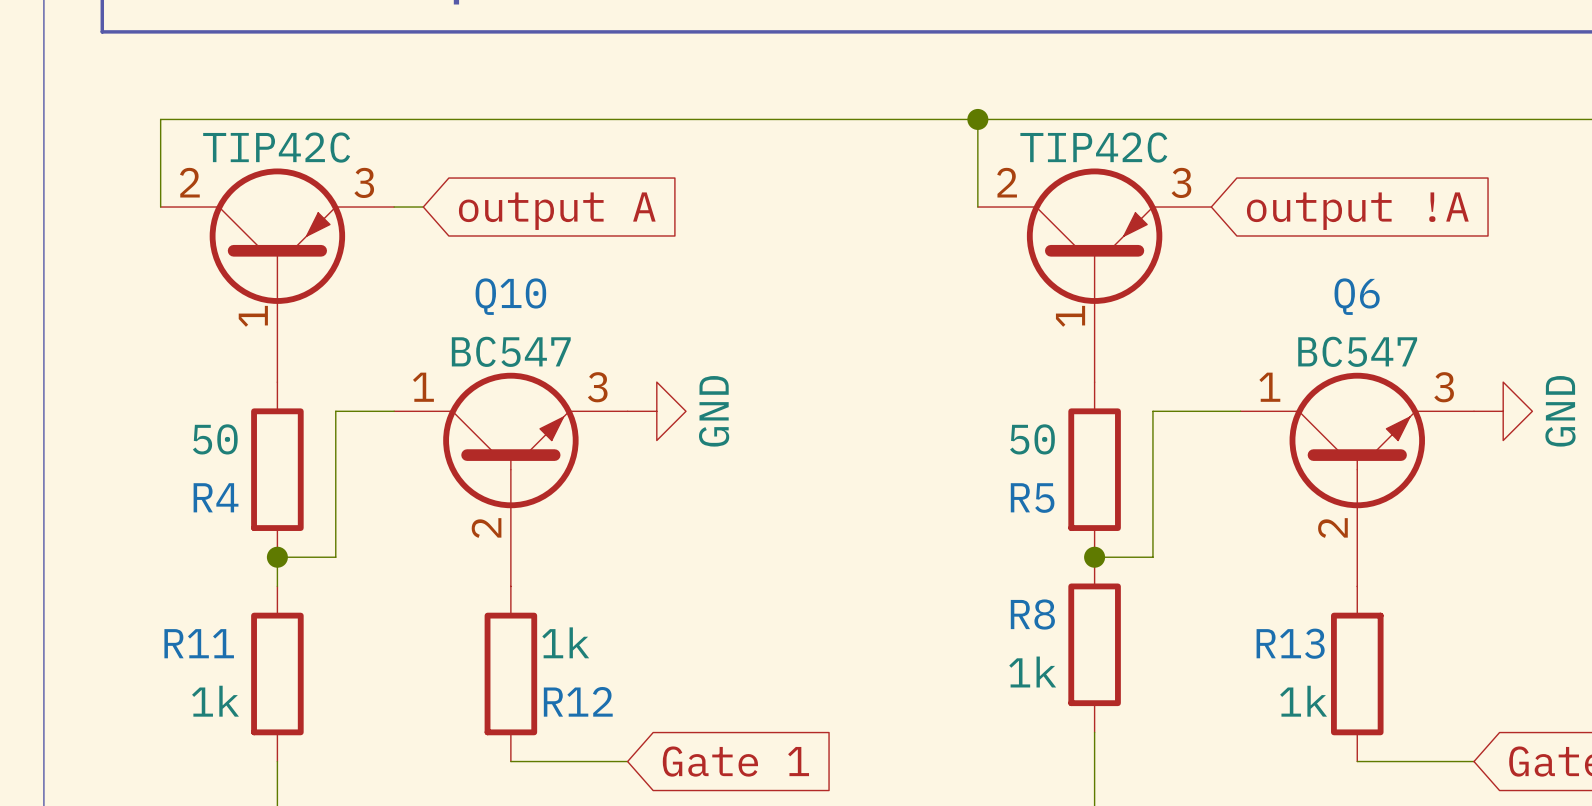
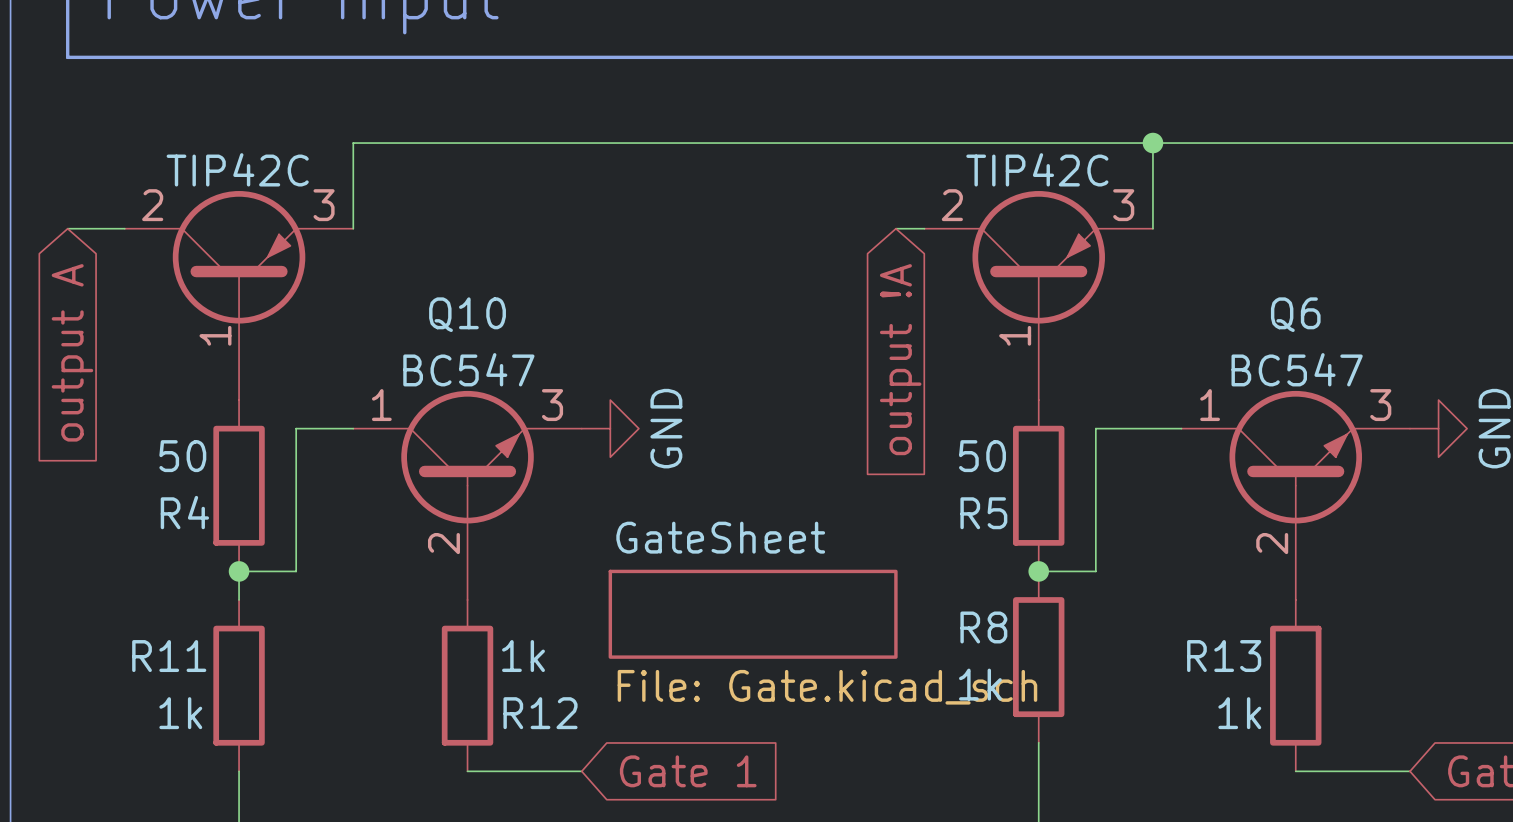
wire: (394, 119) (160, 119) (160, 207) -> (67, 228) (124, 228)
wire: (977, 119) (977, 207) -> (895, 228) (924, 228)
junction: (977, 119) -> none
wire: none -> (1152, 143) (1152, 228)
junction: none -> (1152, 143)
wire: (394, 207) (423, 207) -> (353, 228) (353, 143)
global label rotation: 0° (557, 211) -> 90° clockwise (72, 352)
global label position: output A (557, 211) -> output A (72, 352)
global label rotation: 0° (1357, 211) -> 90° clockwise (900, 359)
global label position: output !A (1357, 211) -> output !A (900, 359)
sheet GateSheet: none -> File: Gate.kicad_sch (753, 614)

